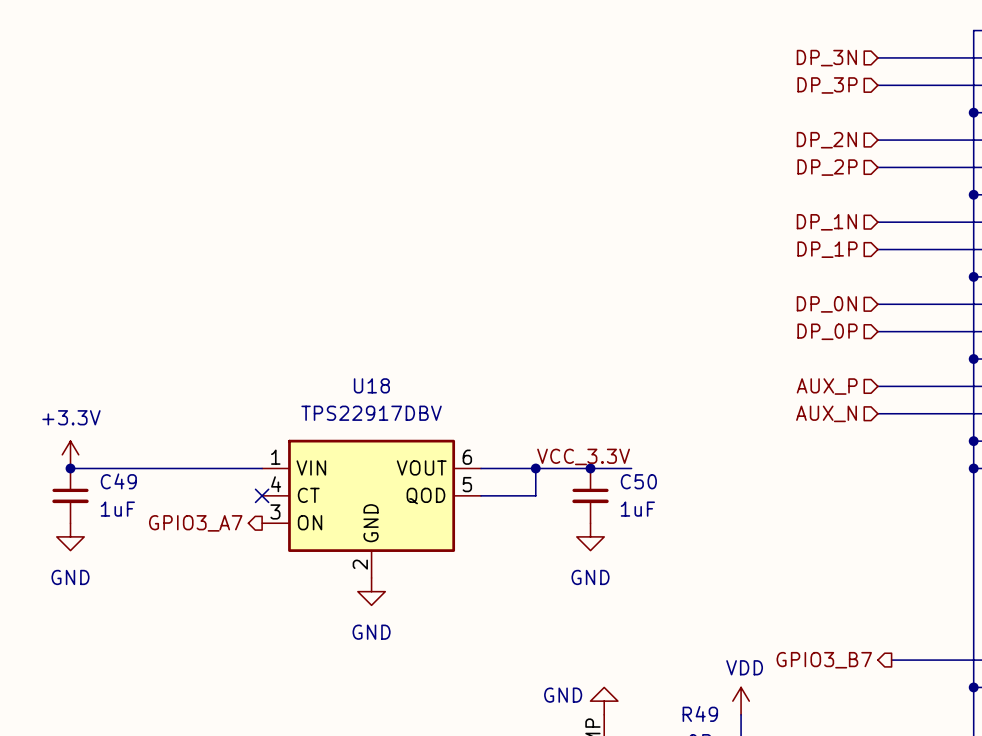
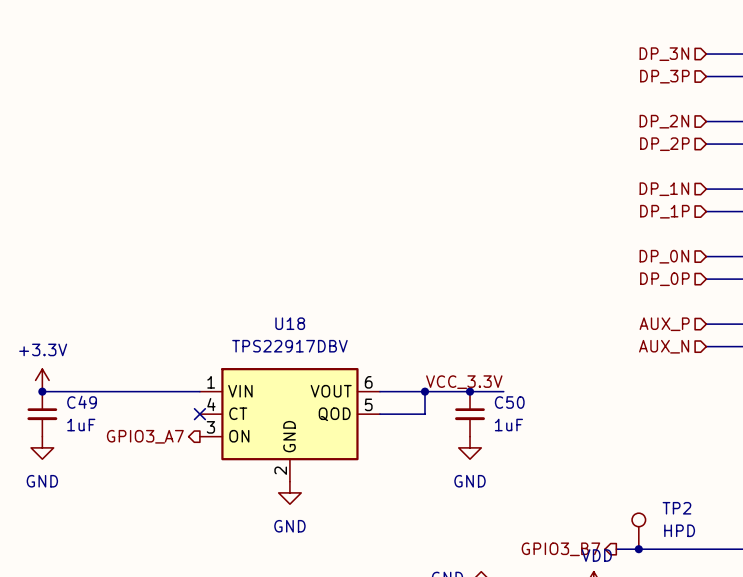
TP2: none -> HPD (638, 531)
wire: none -> (616, 549) (717, 549)
junction: none -> (638, 549)
hierarchical label position: GPIO3_B7 (824, 660) -> GPIO3_B7 (560, 549)

